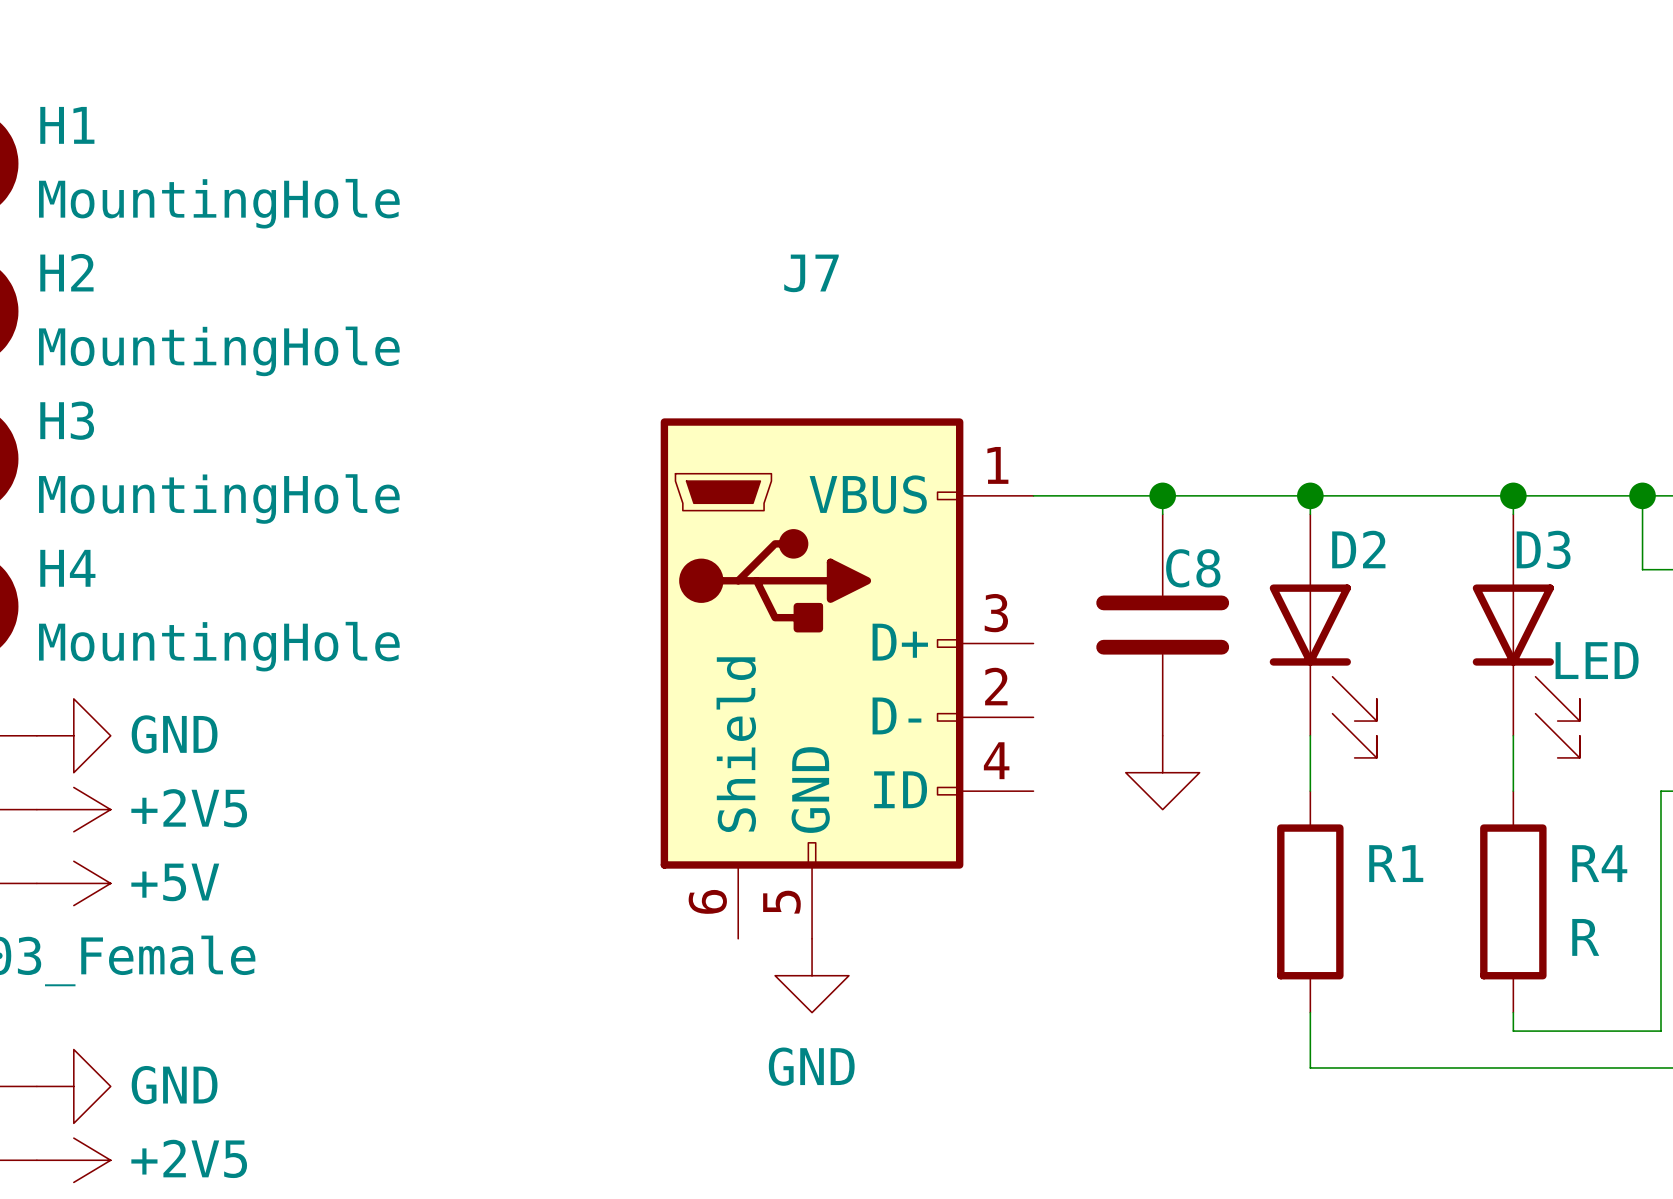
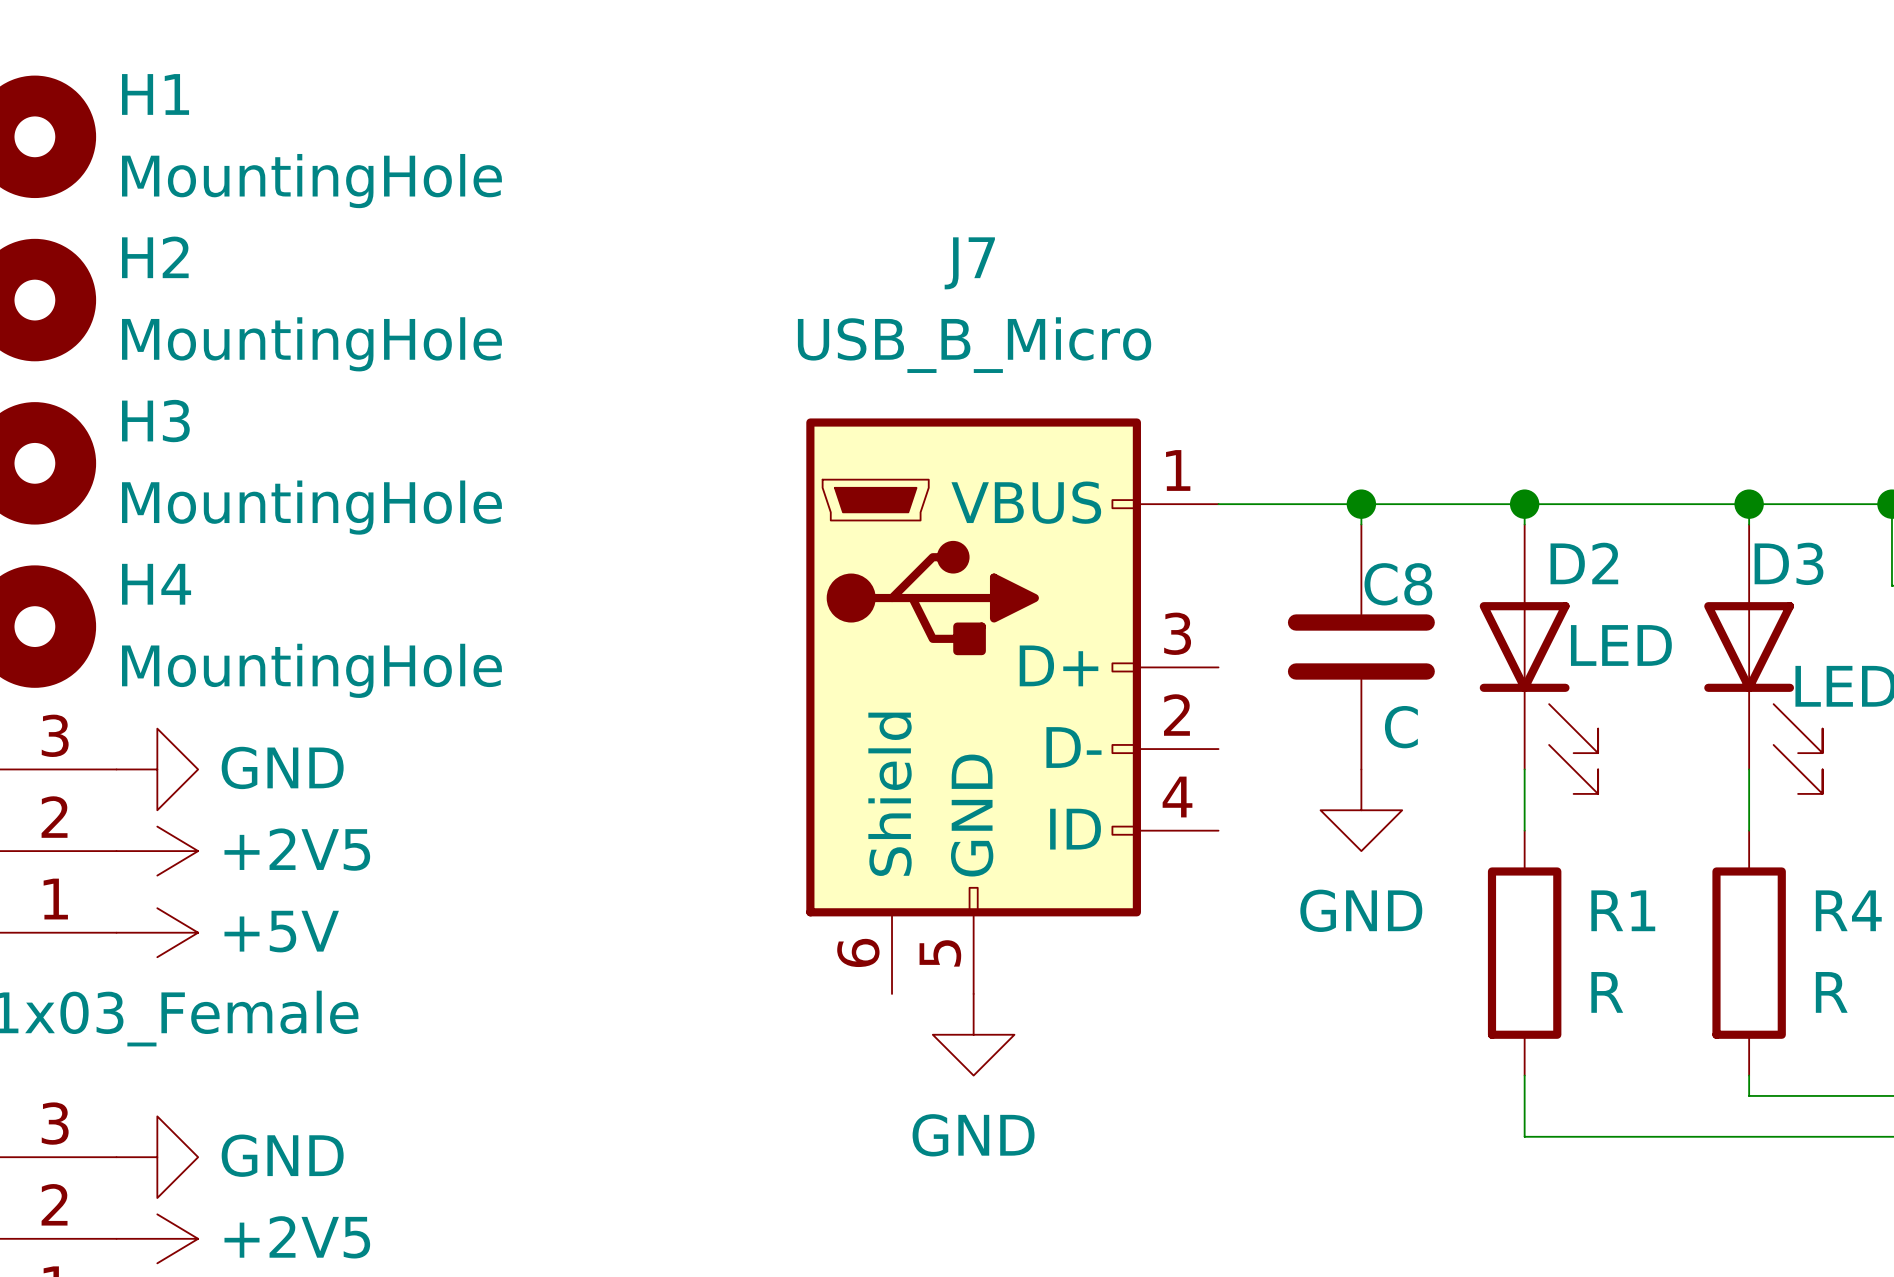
J7 value: none -> USB_B_Micro (974, 345)
D2 value: none -> LED (1621, 645)
C8 value: none -> C (1401, 727)
power symbol text: none -> GND (1361, 910)
R1 value: none -> R (1607, 992)

